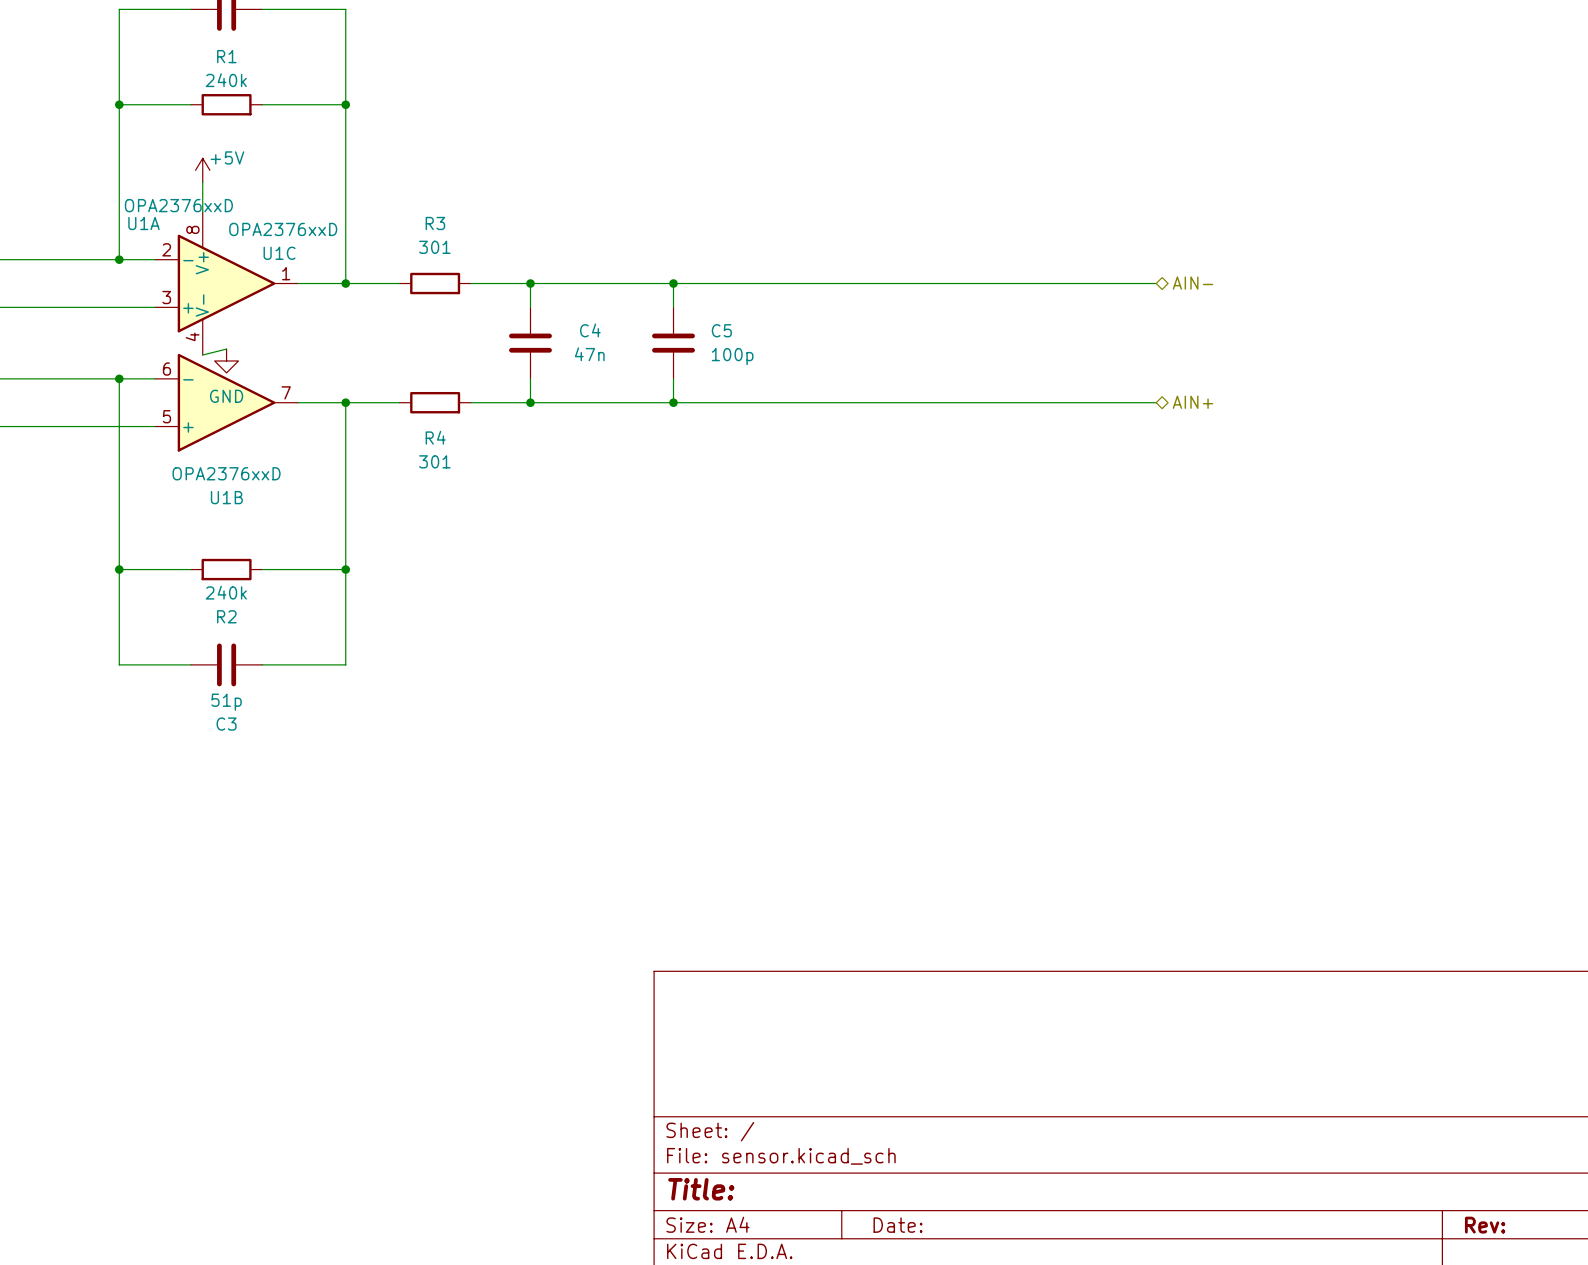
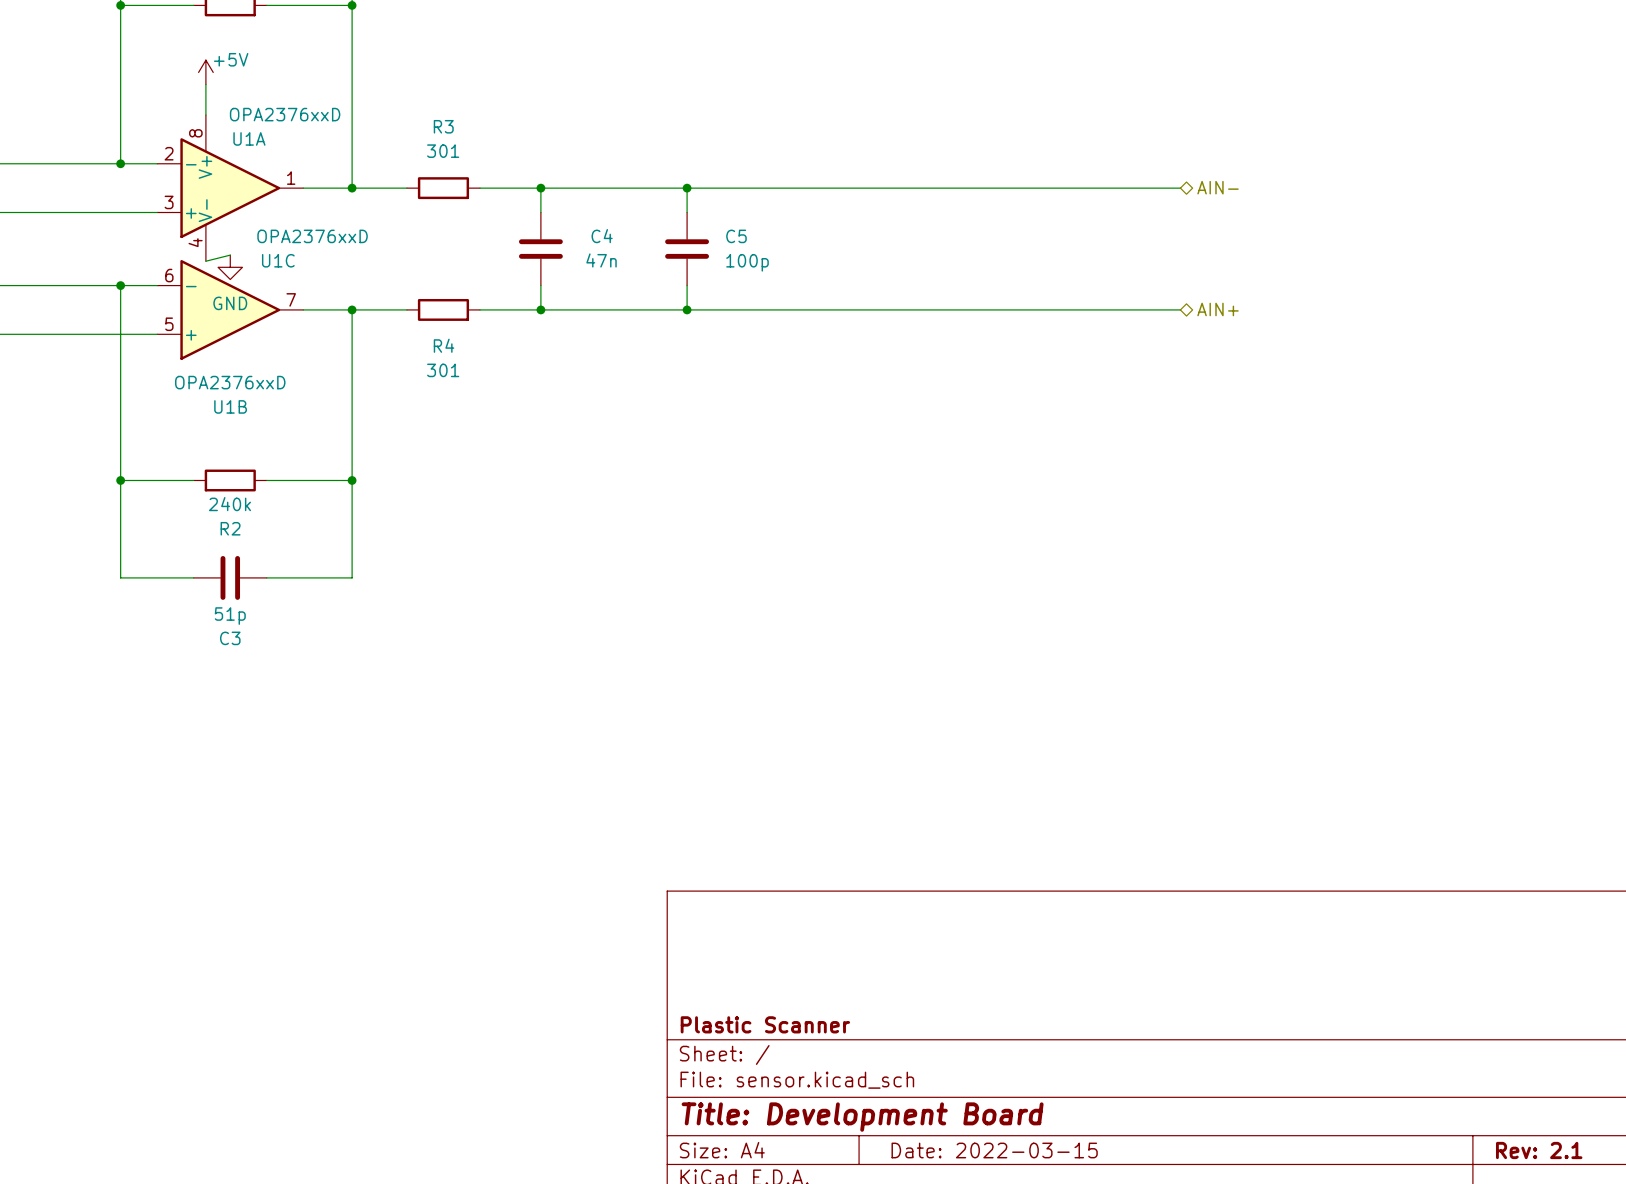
U1A value position: OPA2376xxD (178, 205) -> OPA2376xxD (285, 114)
U1A name position: U1A (143, 223) -> U1A (249, 138)
U1C value position: OPA2376xxD (283, 229) -> OPA2376xxD (312, 236)
U1C name position: U1C (279, 253) -> U1C (278, 260)
title block: none -> Plastic Scanner (765, 1024)
title block: Title: (701, 1189) -> Title: Development Board (862, 1117)
title block: Date: (898, 1225) -> Date: 2022-03-15 (994, 1150)
title block: Rev: (1485, 1225) -> Rev: 2.1 (1539, 1150)

